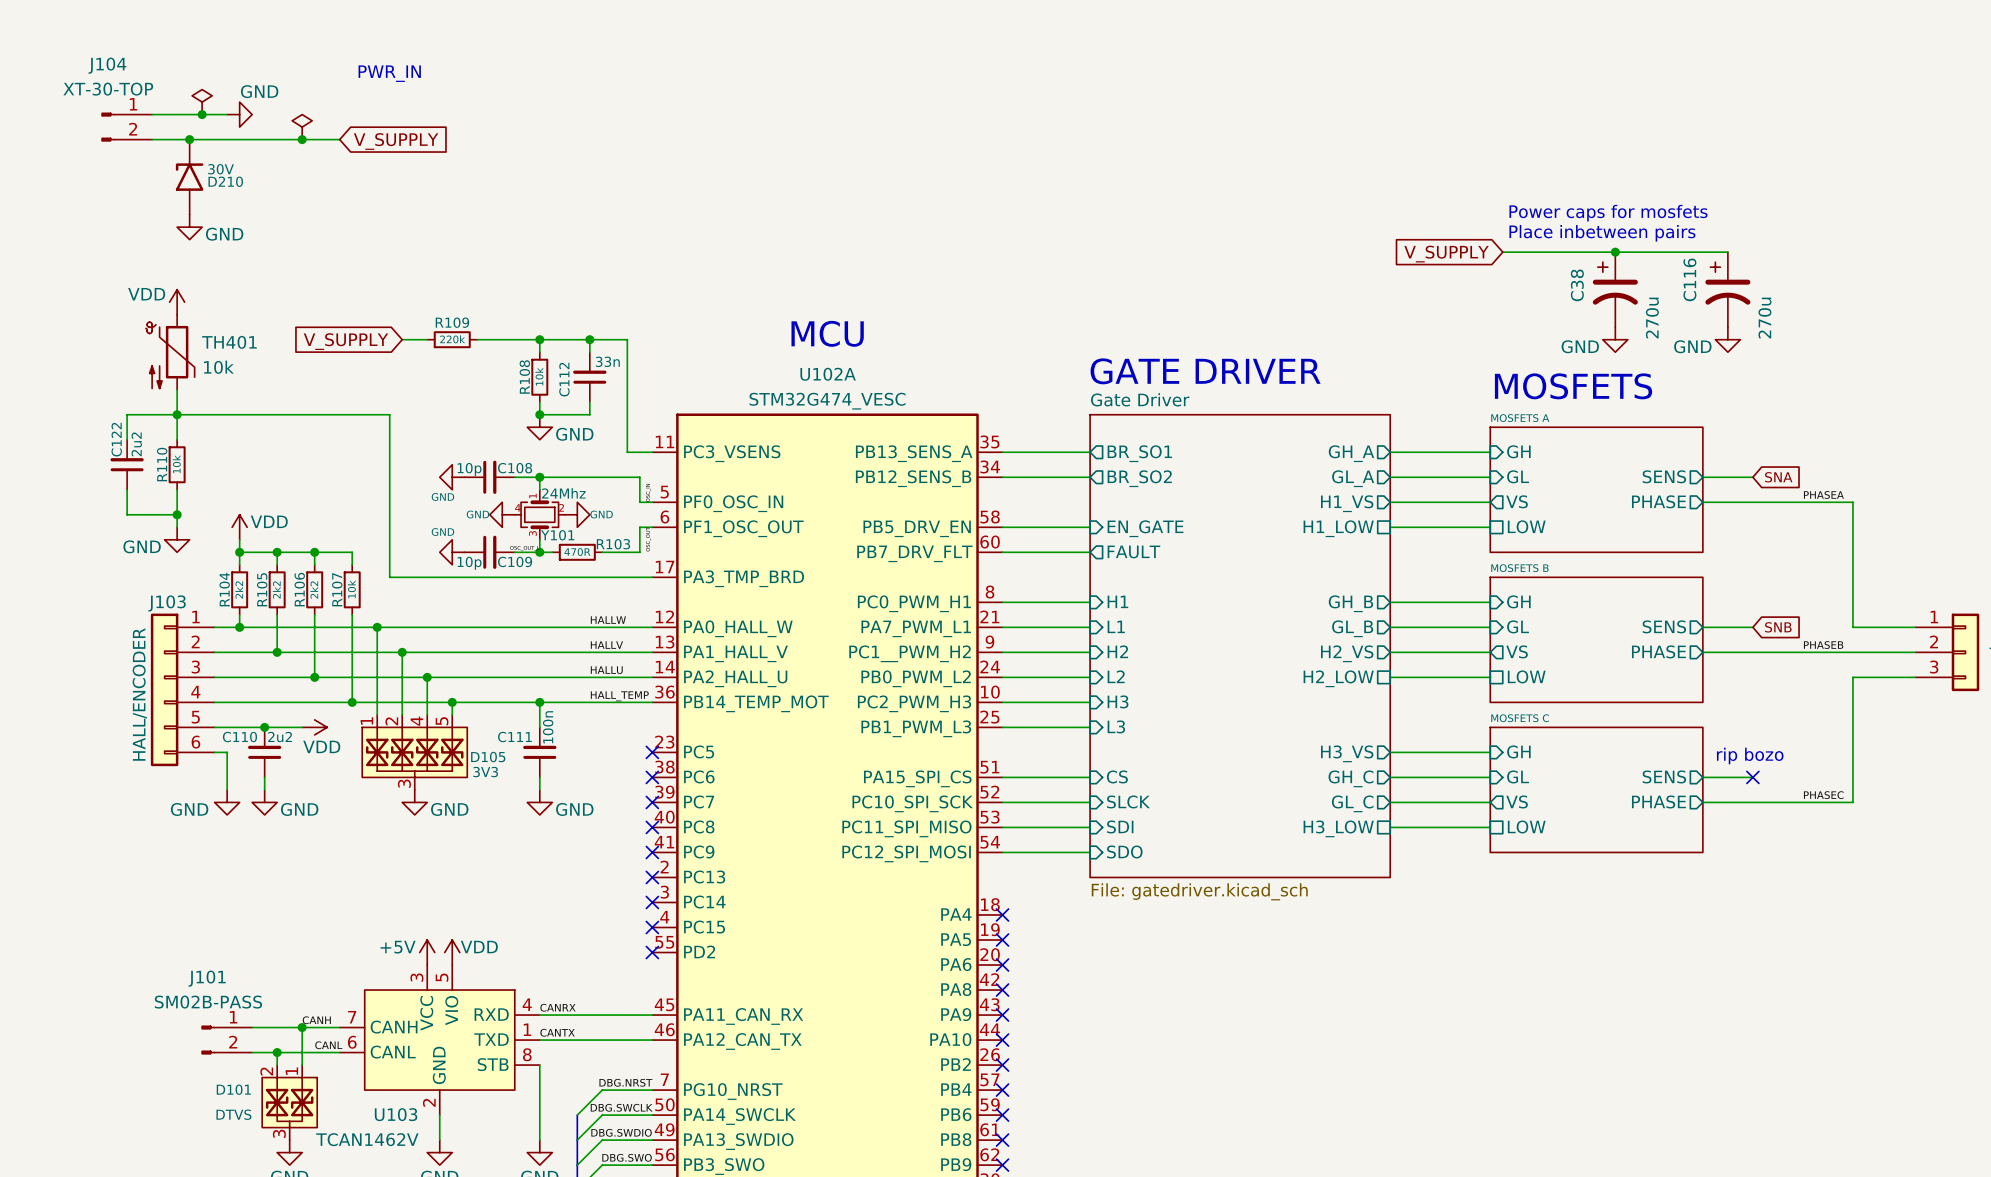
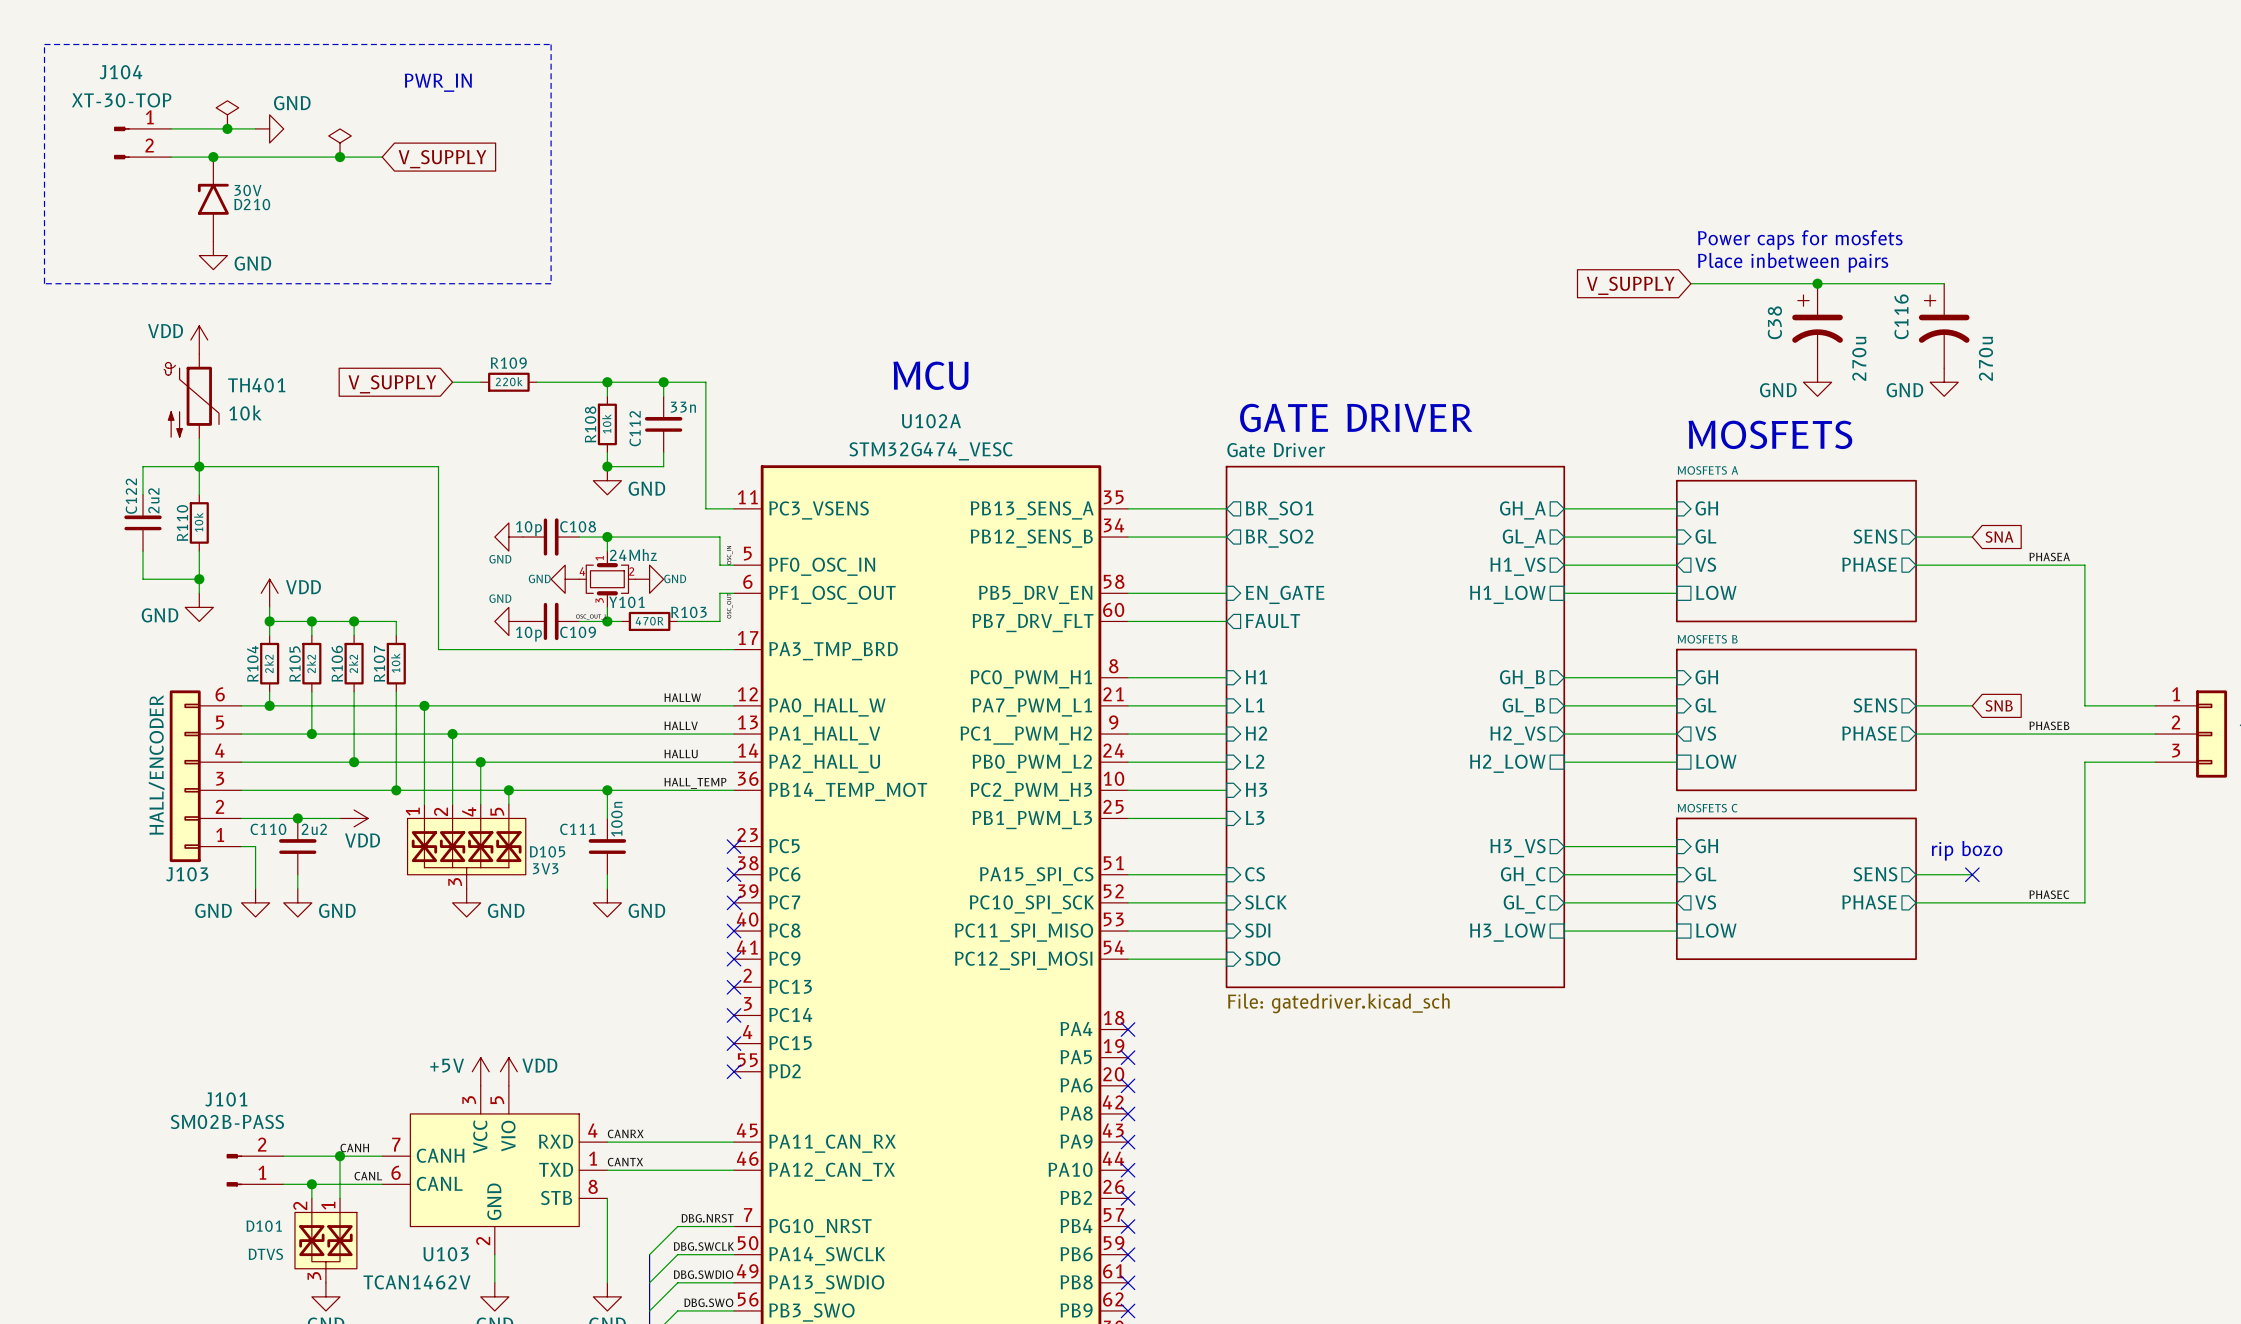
line: none -> (44, 44) (551, 44) (551, 283) (44, 283) (44, 44)
J103 flip: as is (164, 689) -> up-down (185, 776)
J101 flip: as is (208, 1040) -> up-down (234, 1170)

